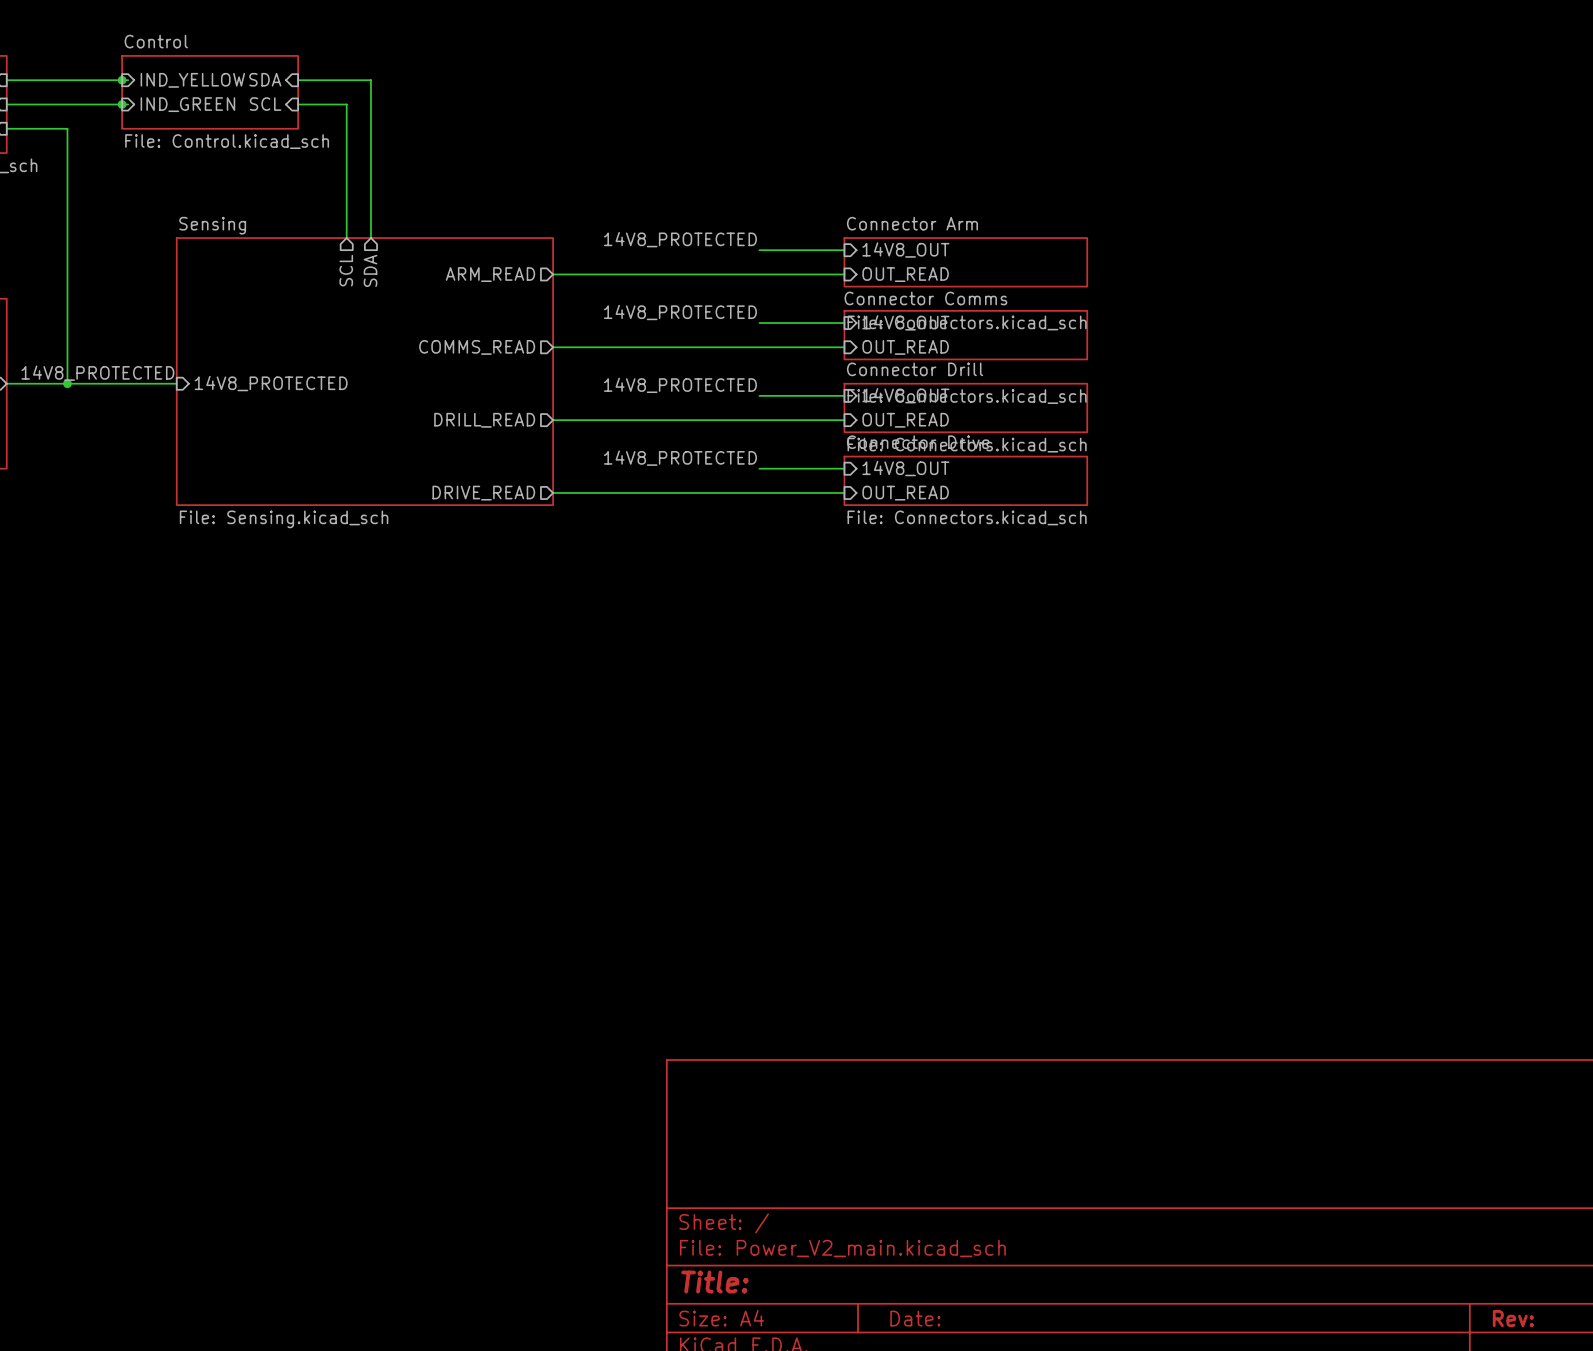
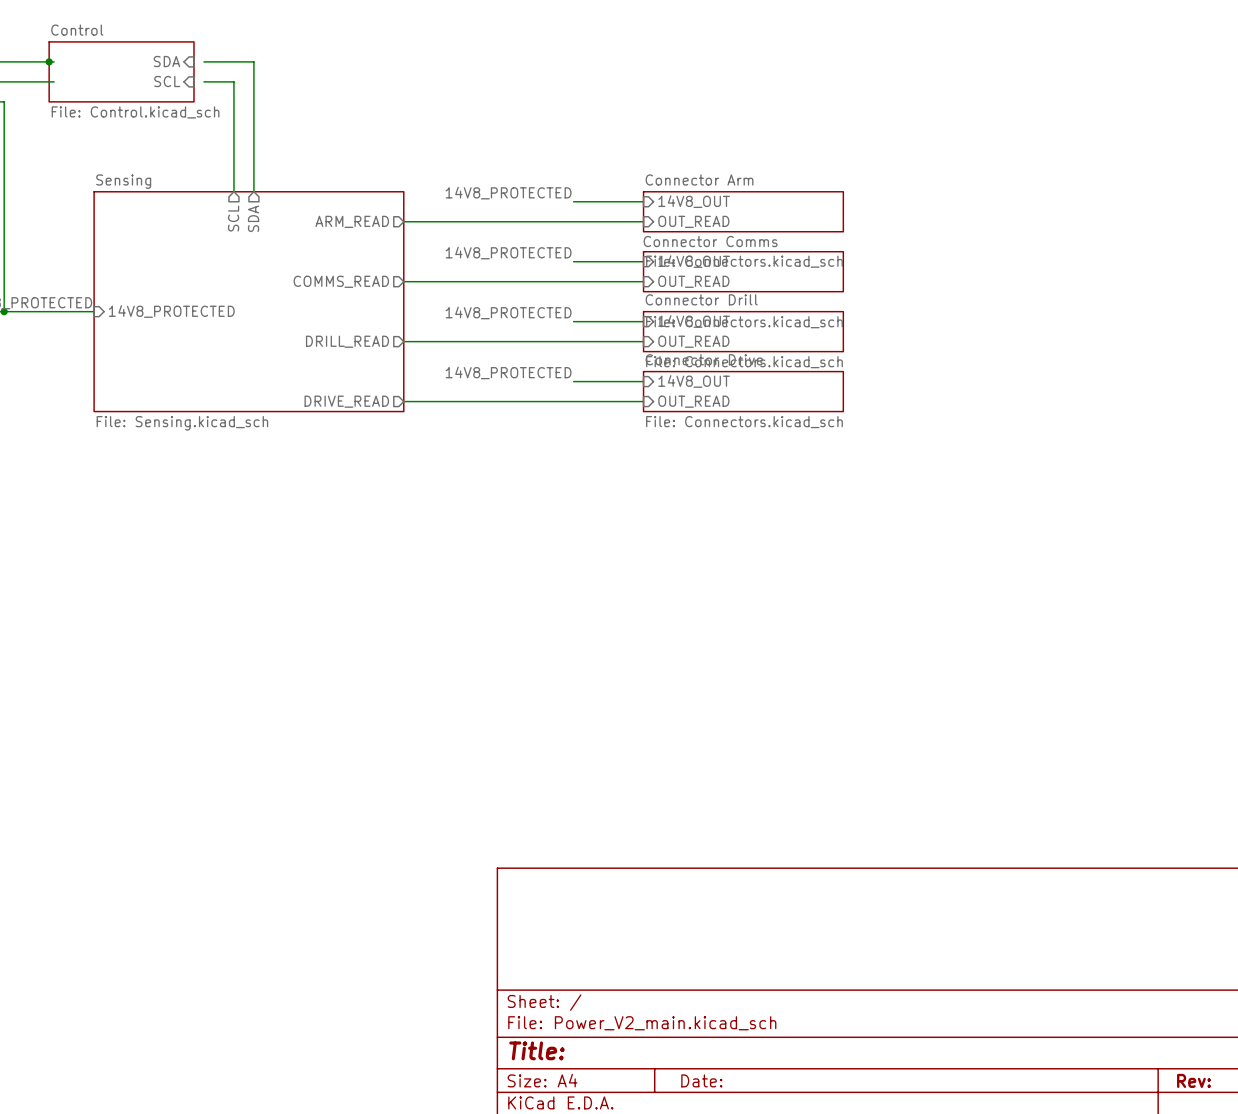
sheet pin: IND_YELLOW (192, 80) -> none
wire: (298, 80) (310, 80) -> none
junction: (122, 104) -> none
sheet pin: IND_GREEN (187, 104) -> none
wire: (298, 104) (310, 104) -> none

